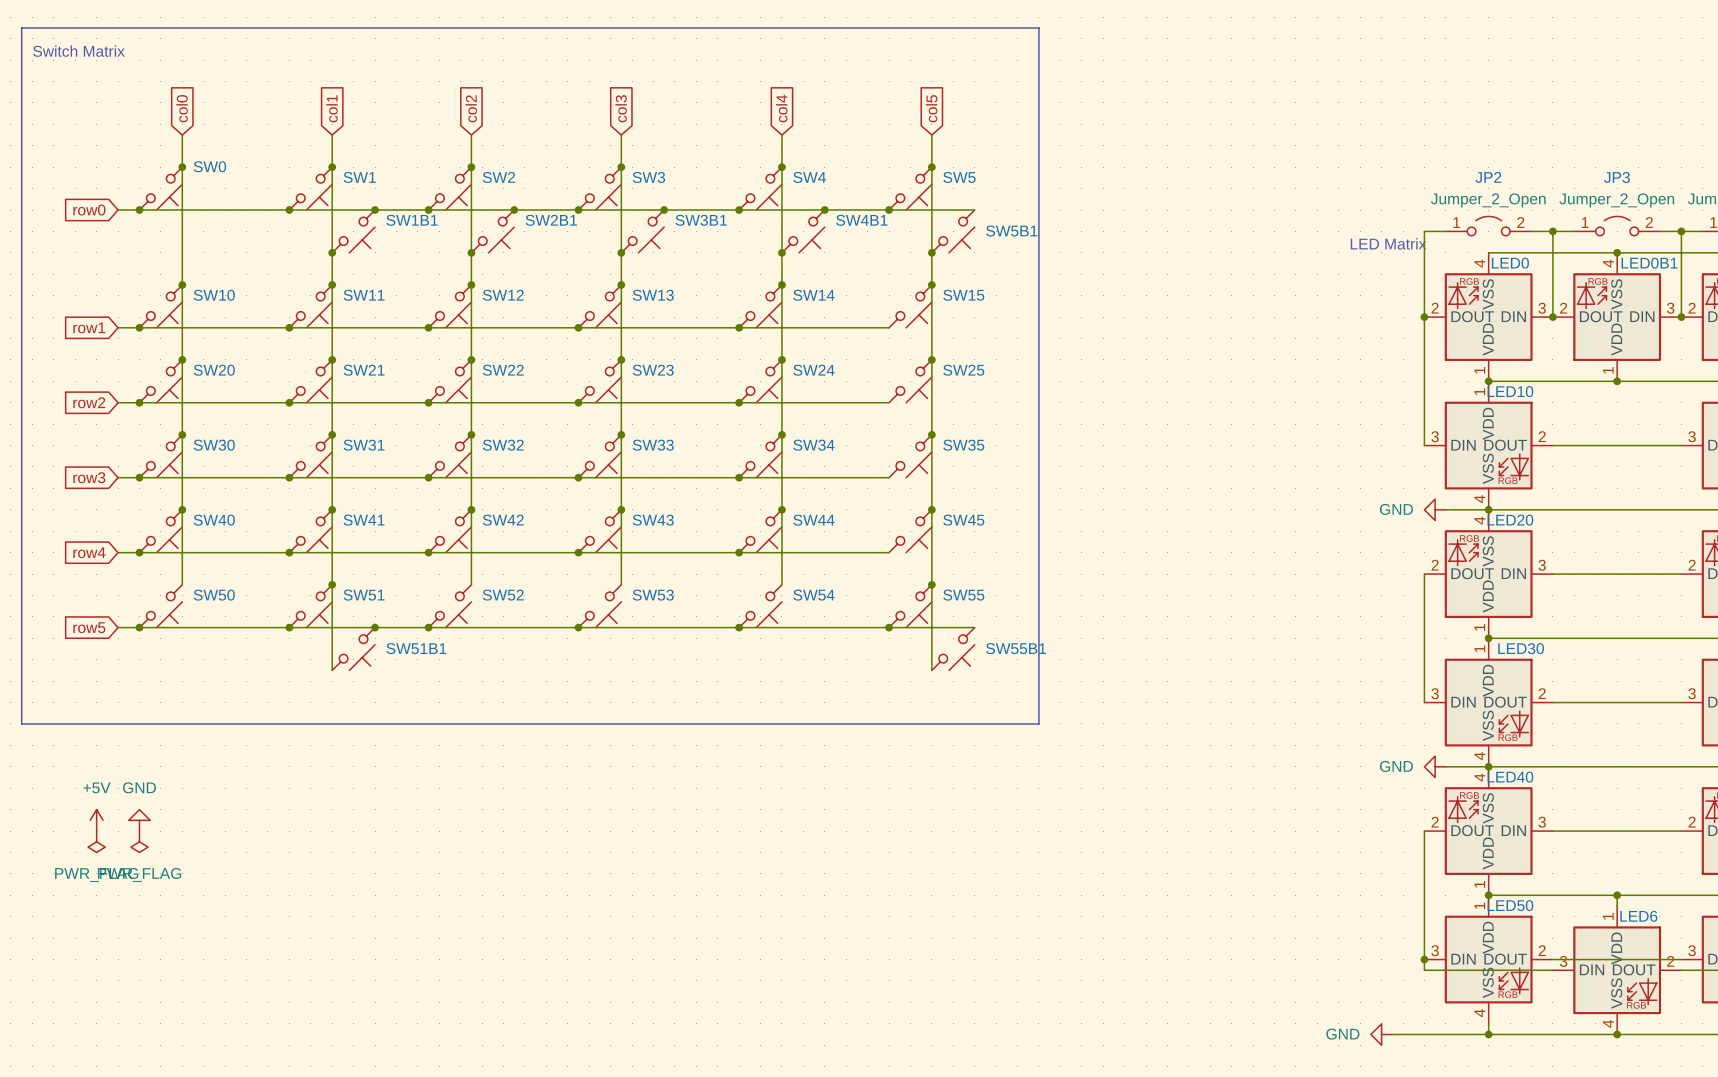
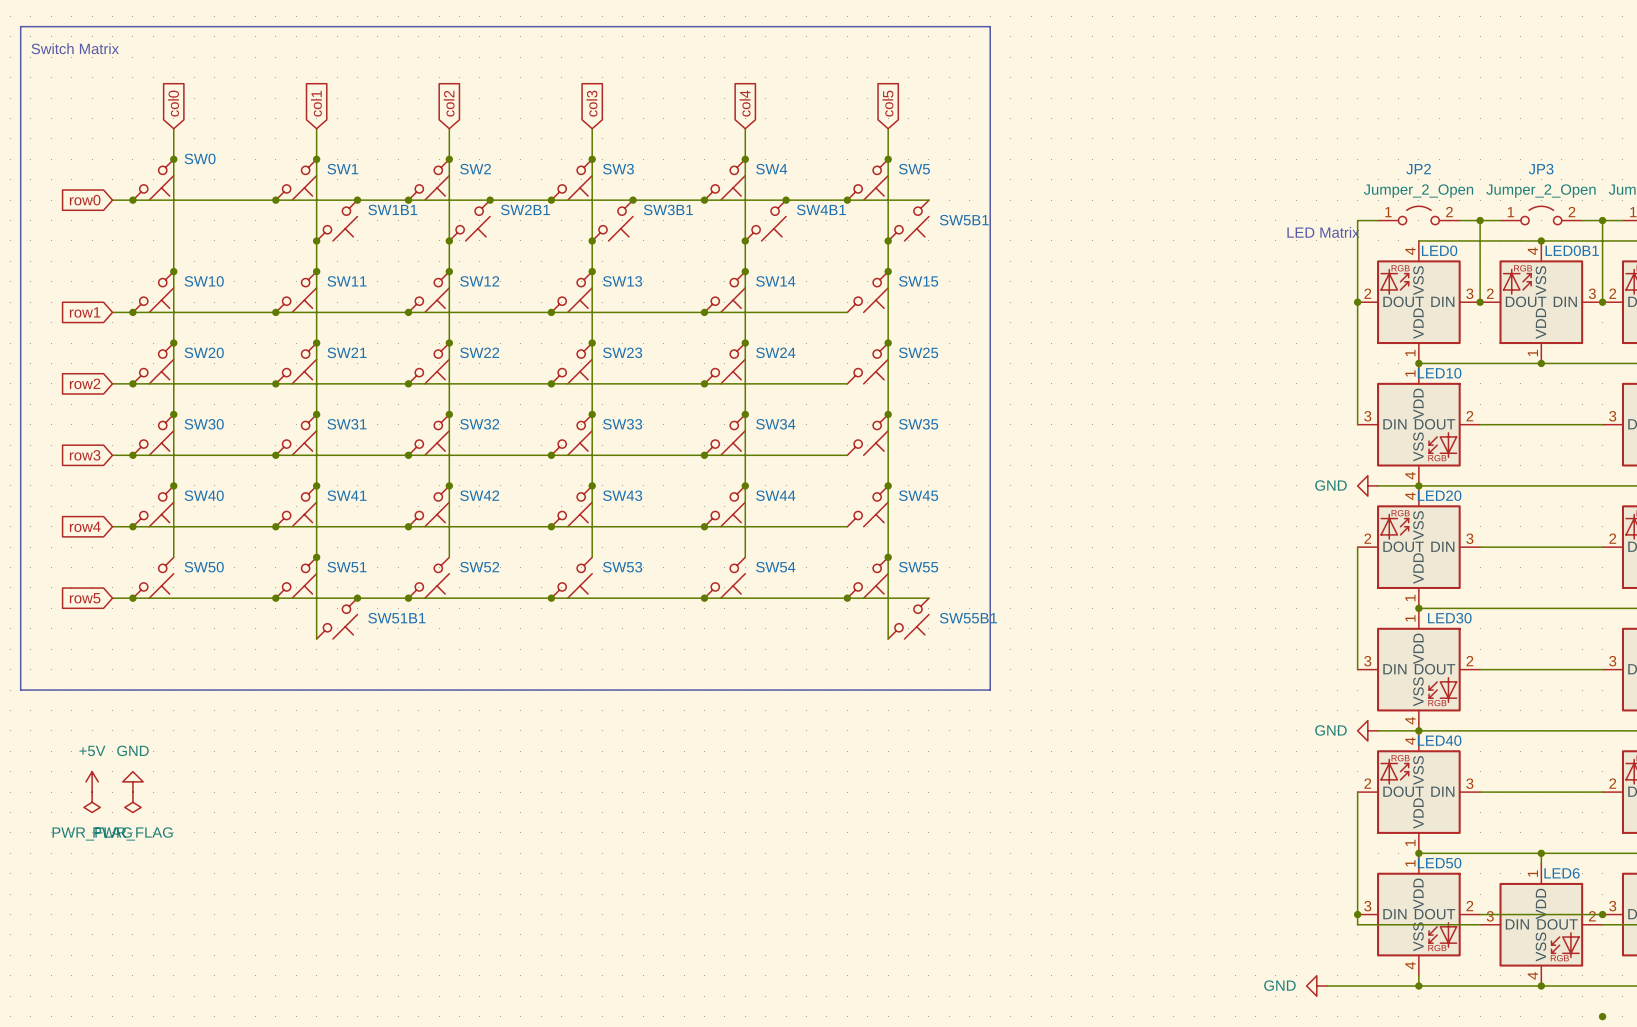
junction: none -> (1602, 914)
junction: none -> (1602, 1016)

